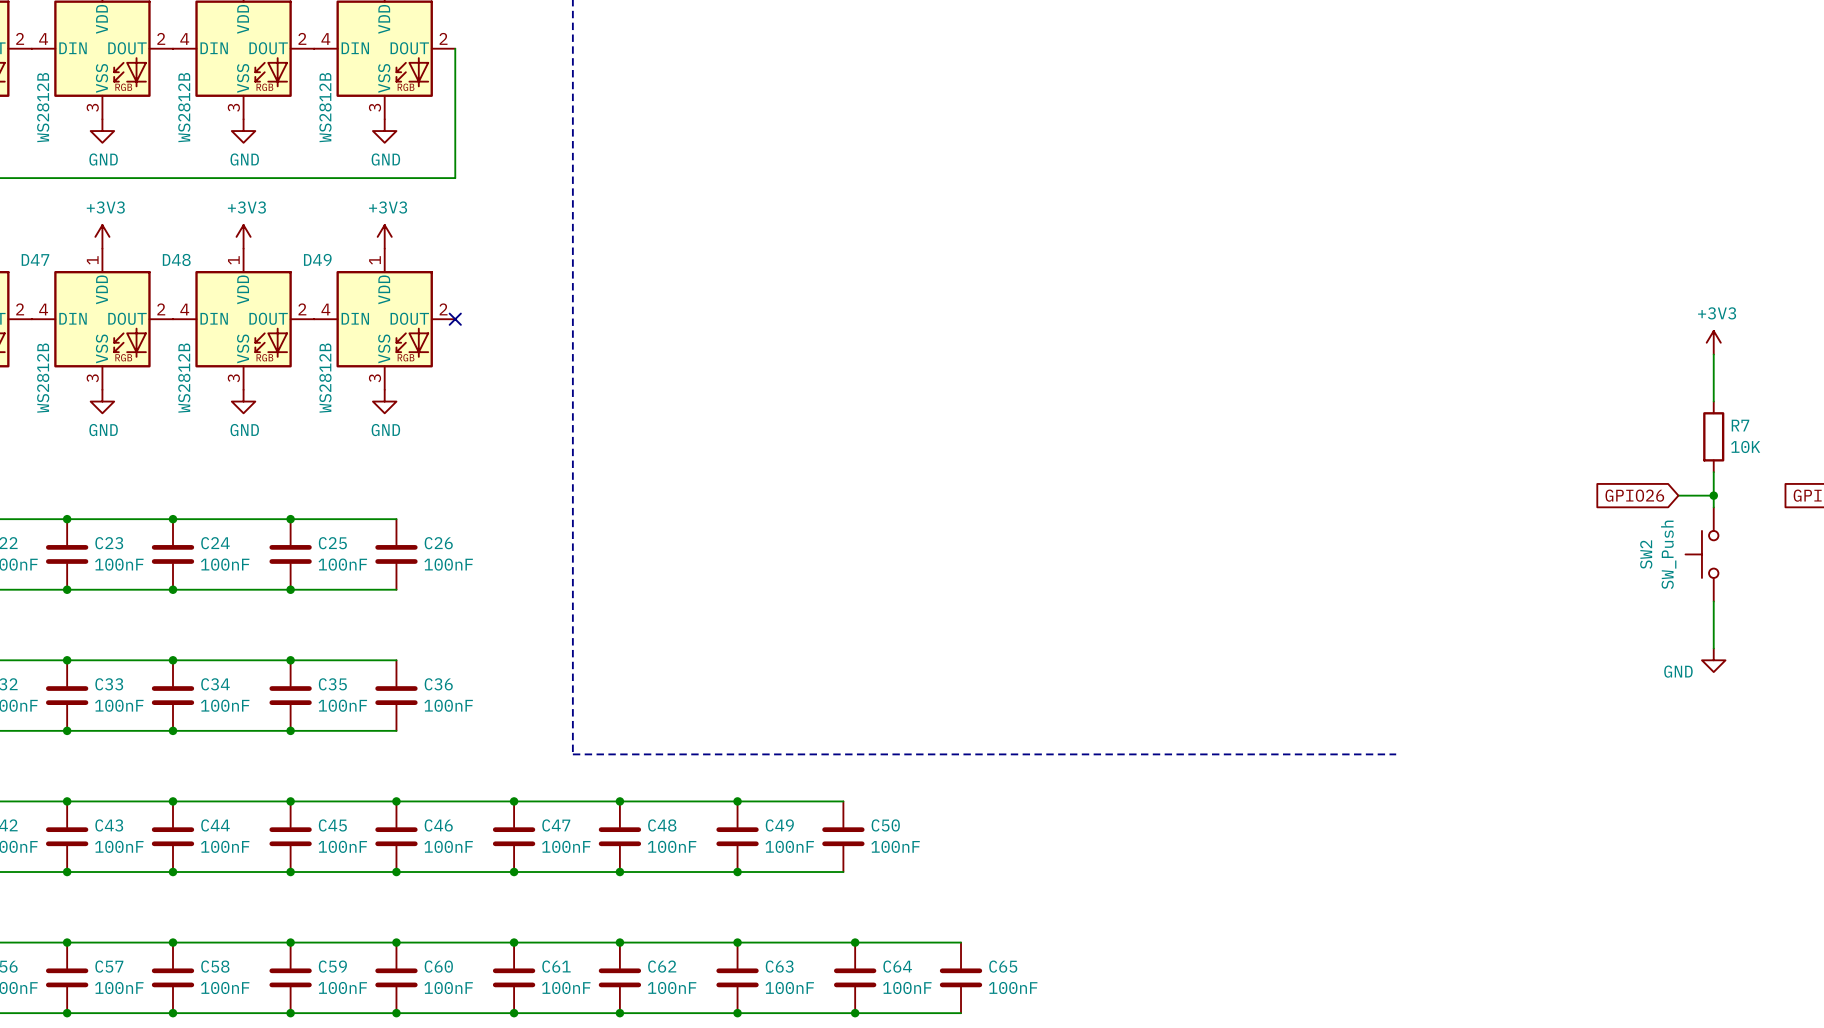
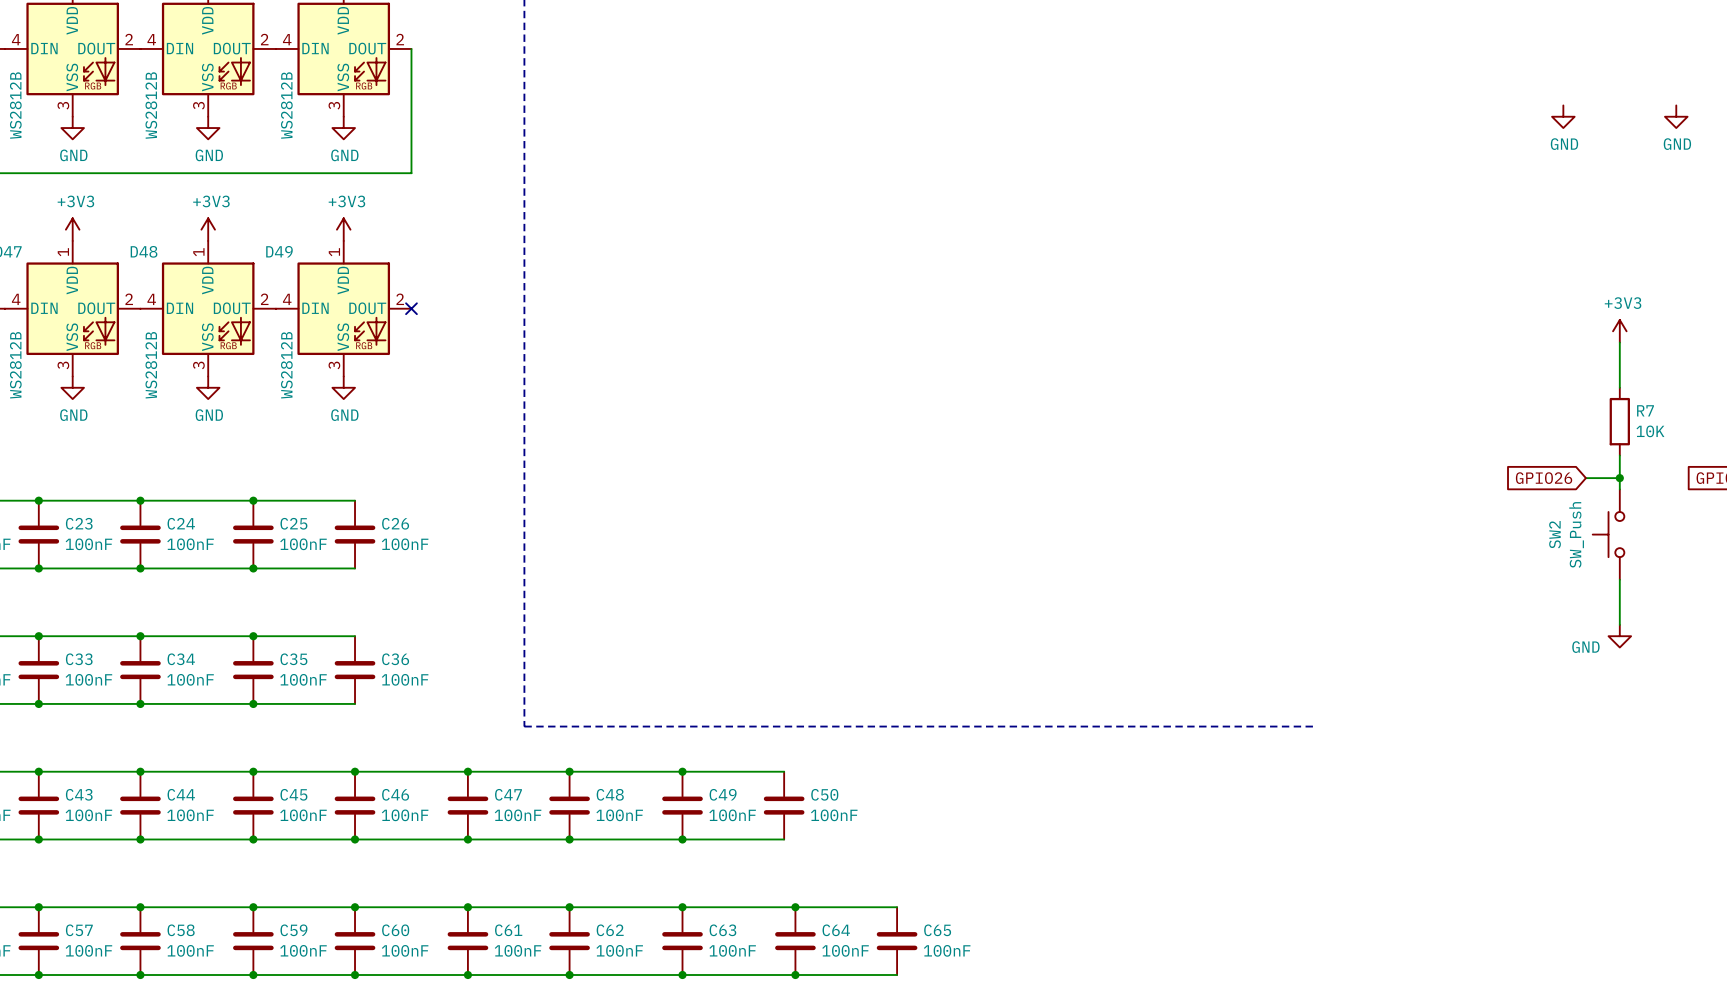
power symbol: none -> GND (1563, 116)
power symbol: none -> GND (1676, 116)

